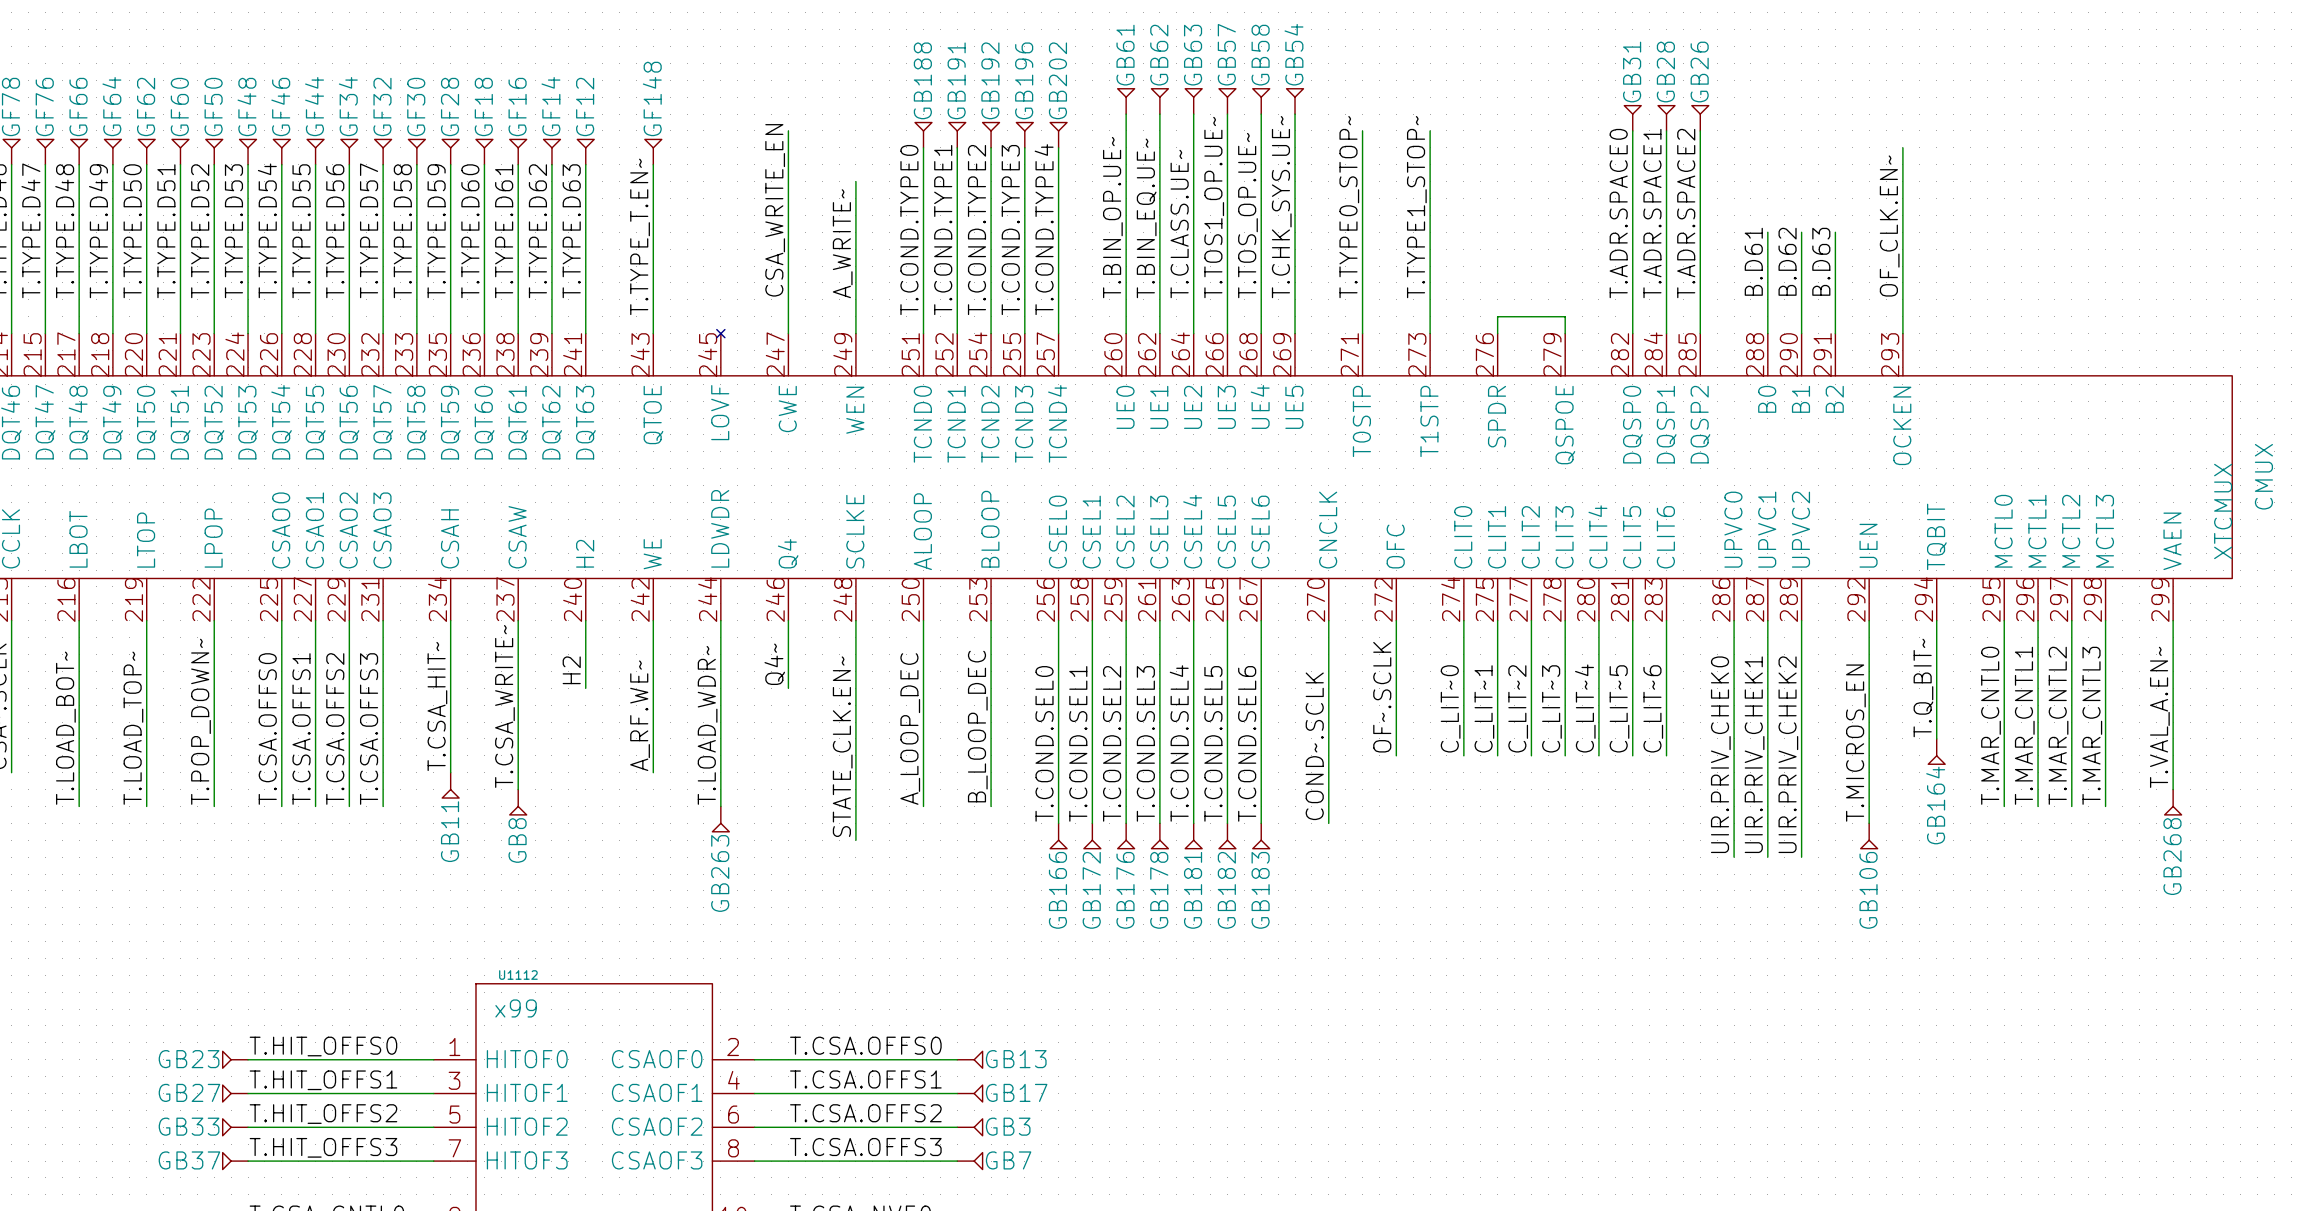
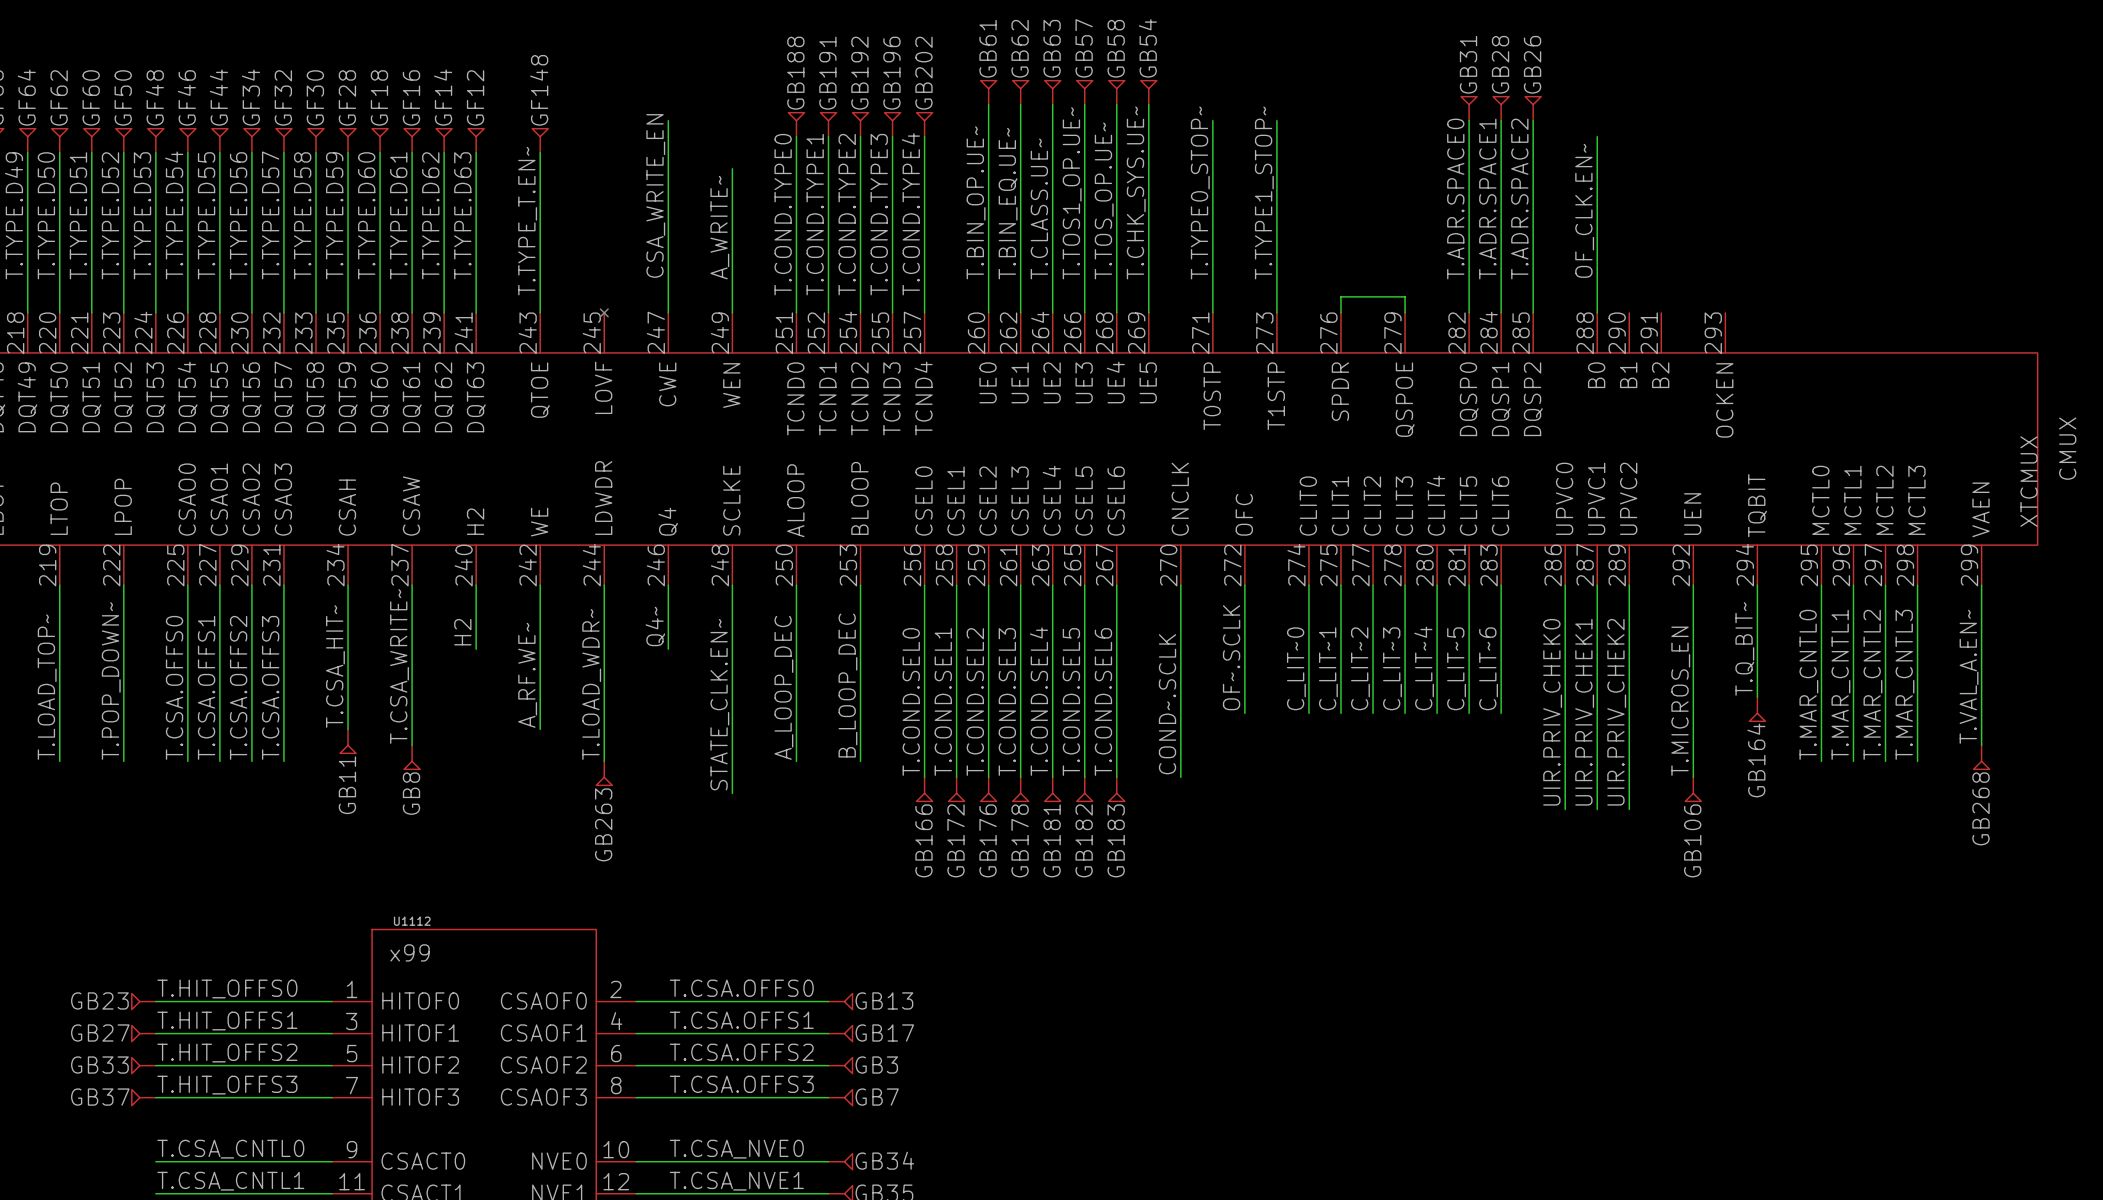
wire: none -> (1597, 136) (1597, 216)
wire: (1902, 147) (1902, 333) -> none
label: OF_CLK.EN~ (1889, 226) -> none
wire: (1801, 232) (1801, 333) -> none
wire: (1835, 232) (1835, 333) -> none
label: B.D61 (1753, 261) -> OF_CLK.EN~ (1584, 210)
label: B.D62 (1787, 261) -> none
label: B.D63 (1821, 261) -> none

